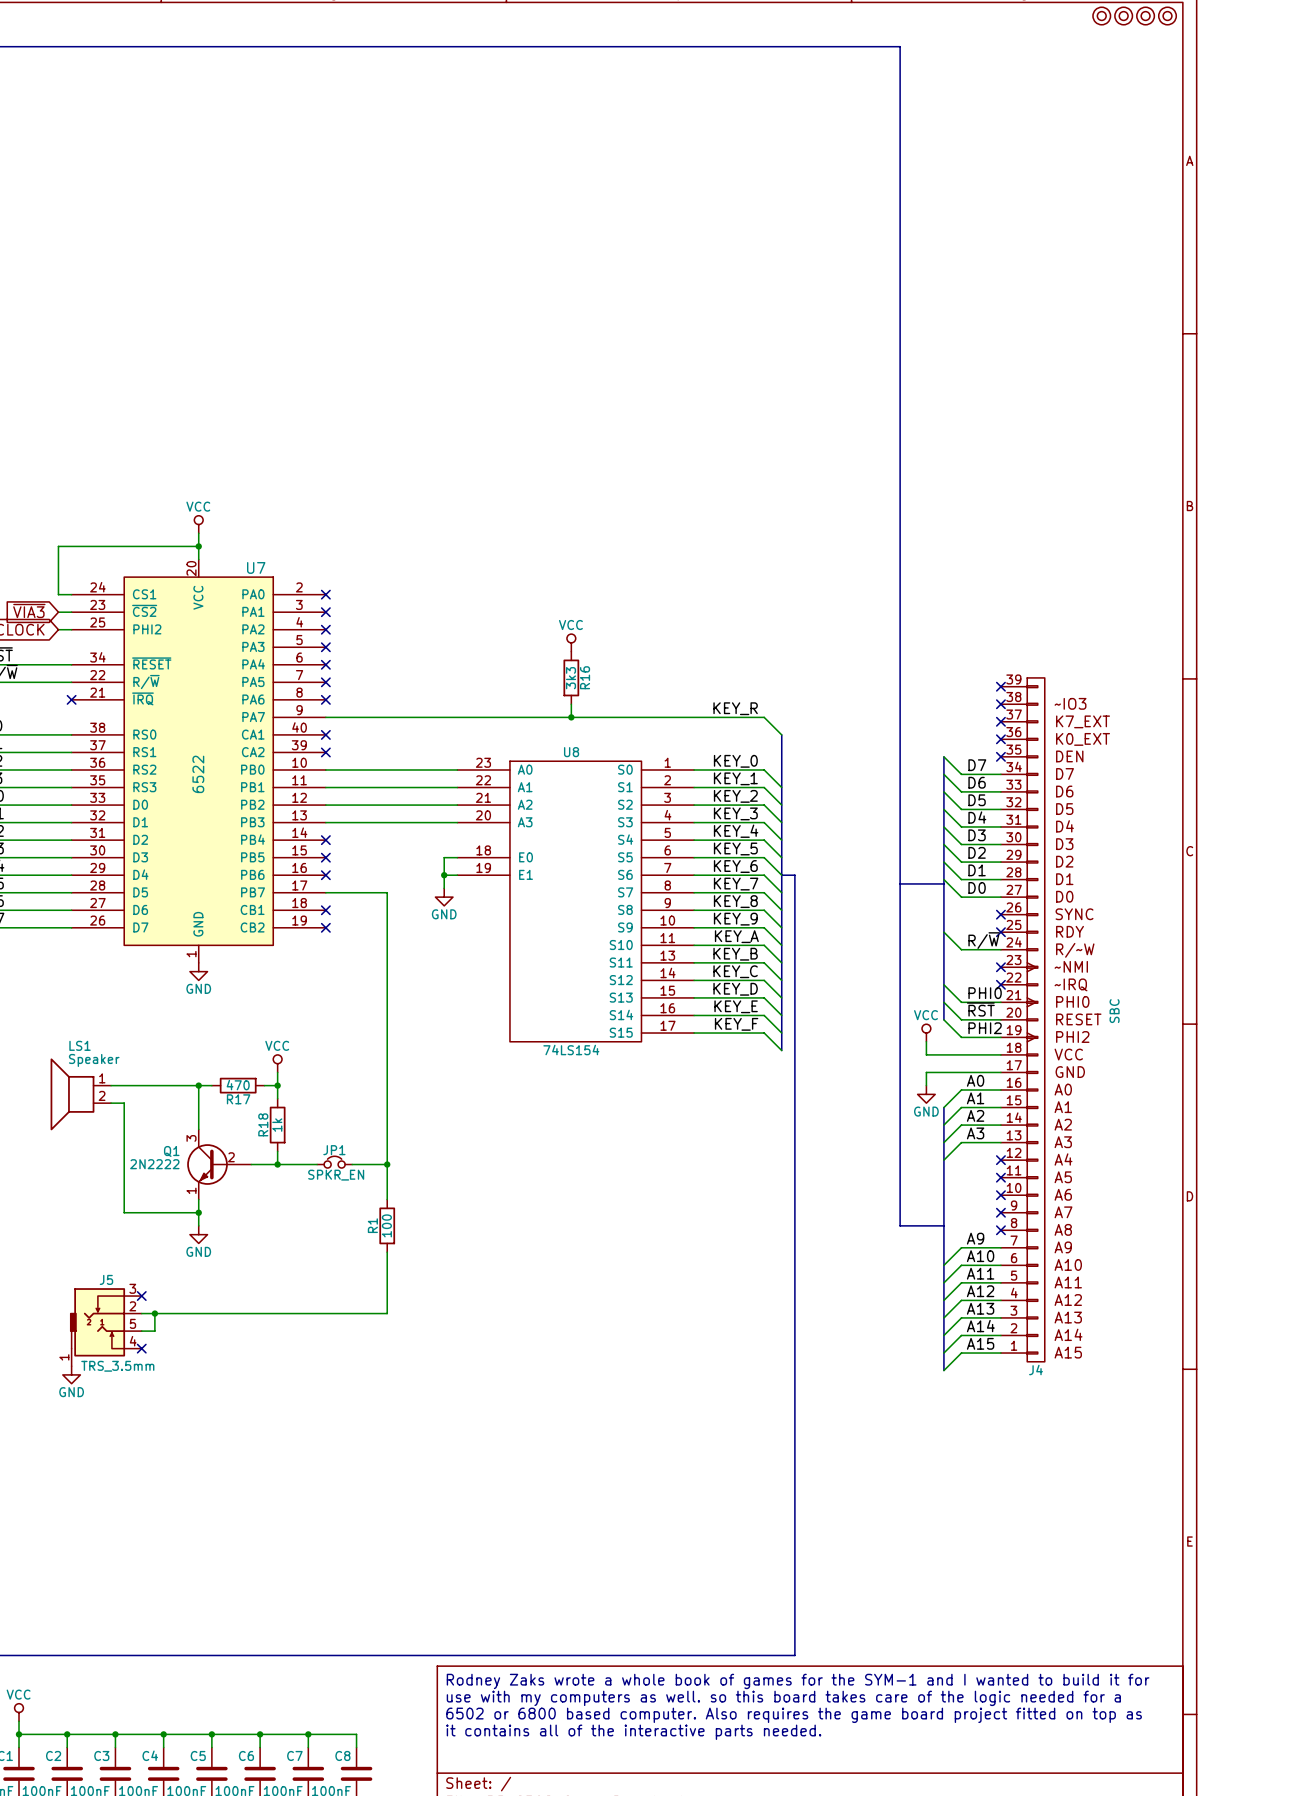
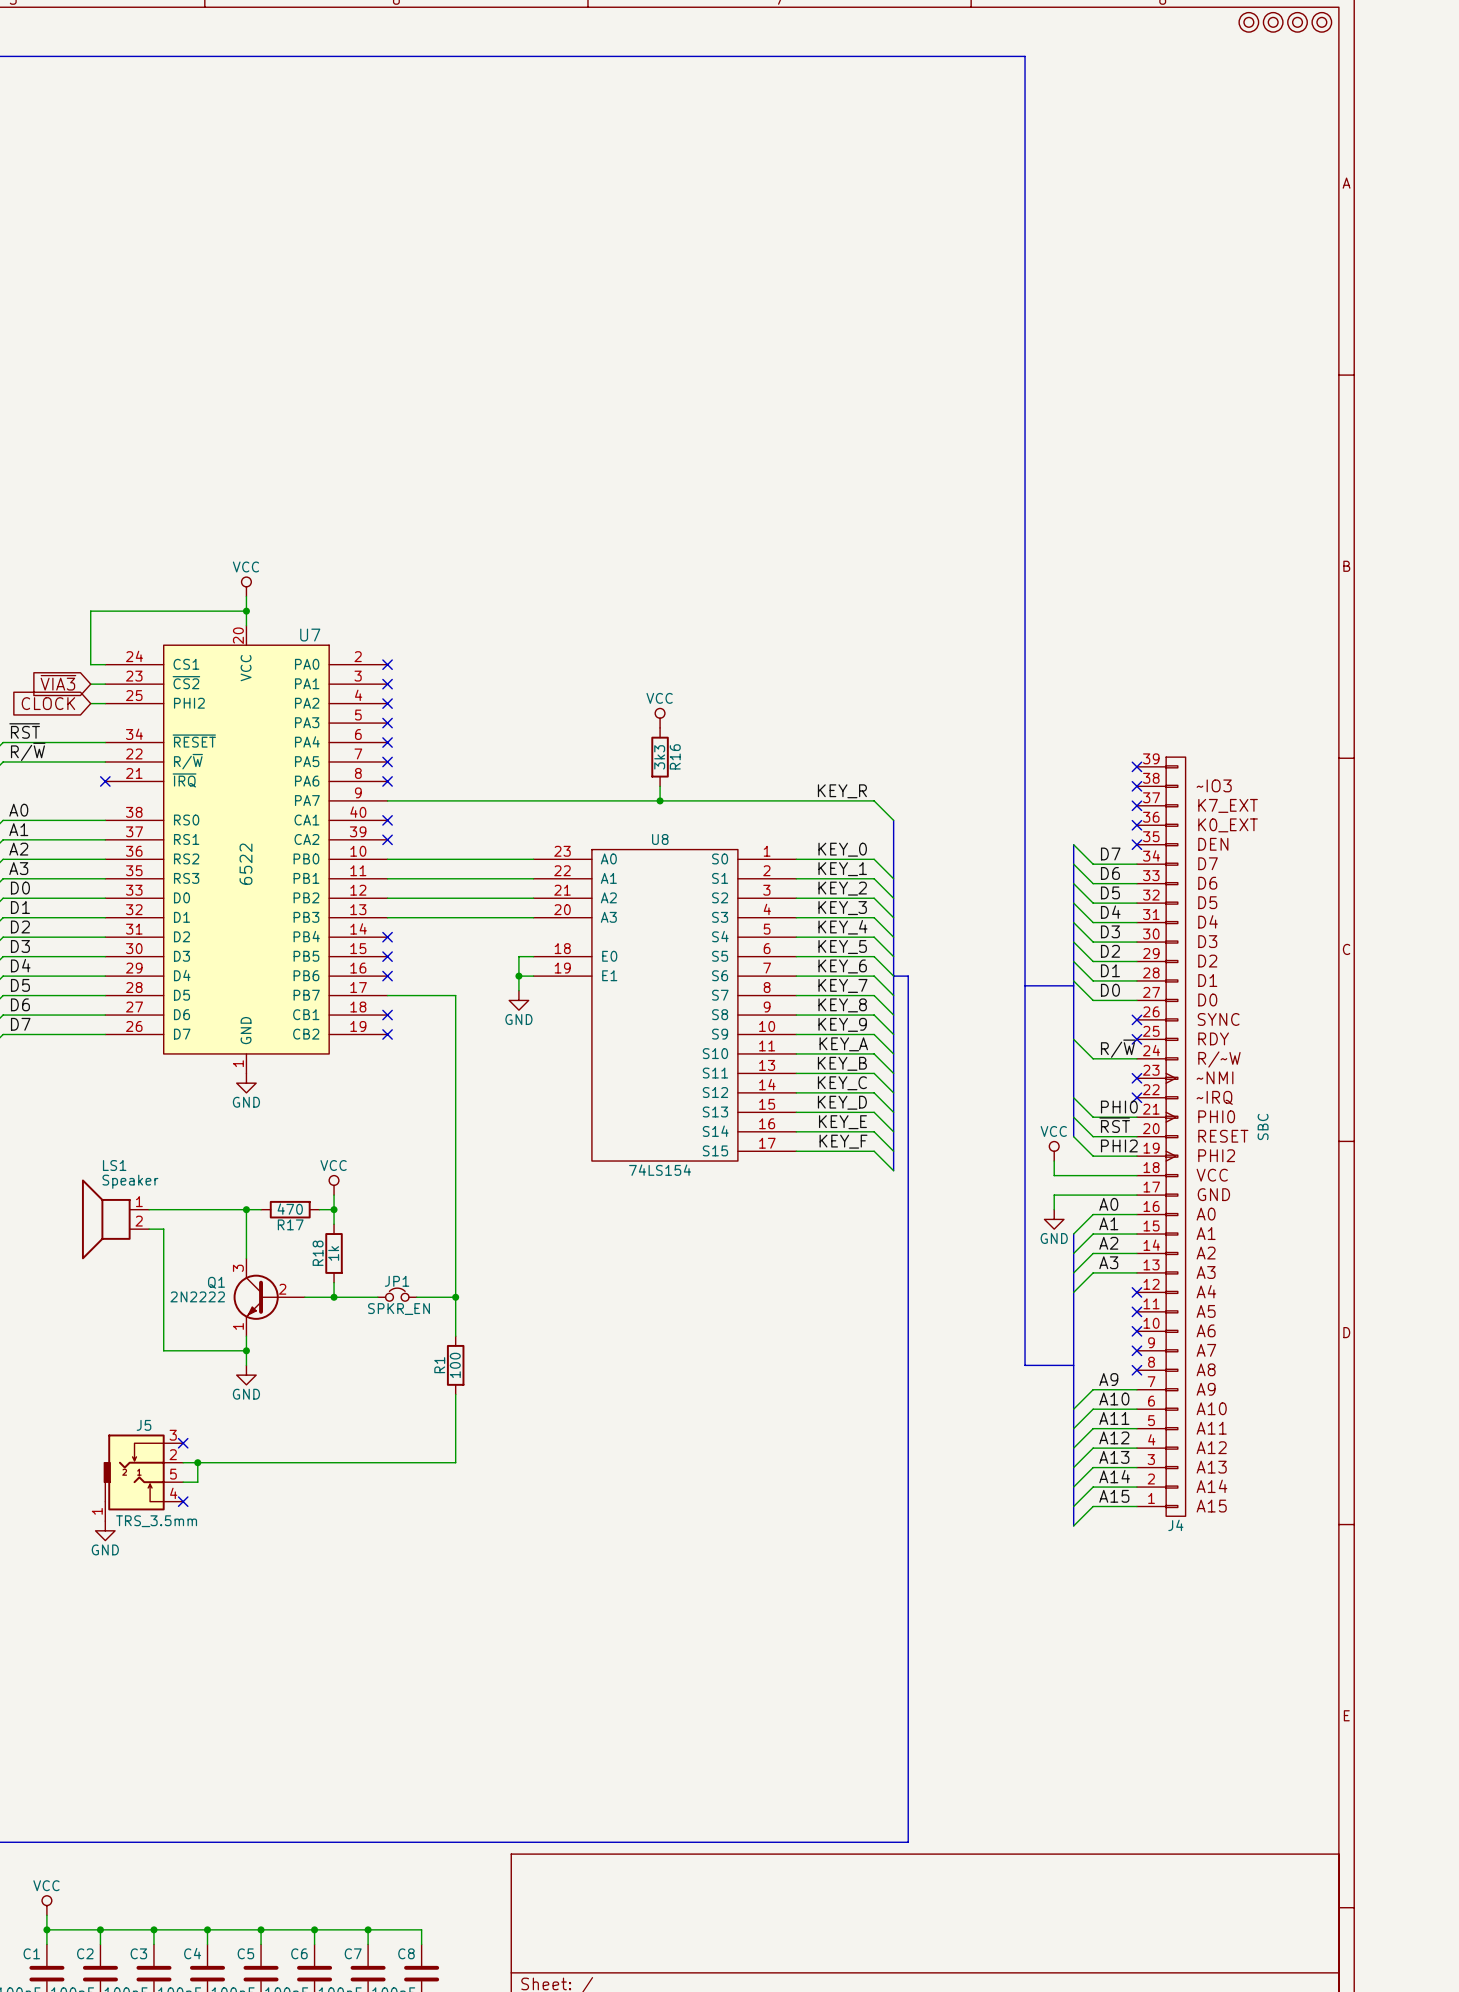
text: Rodney Zaks wrote a whole book of games for the SYM-1 and I wanted to build it for (798, 1681) -> none
text: use with my computers as well. so this board takes care of the logic needed for a (783, 1698) -> none
text: 6502 or 6800 based computer. Also requires the game board project fitted on top as (794, 1715) -> none
text: it contains all of the interactive parts needed. (633, 1732) -> none

